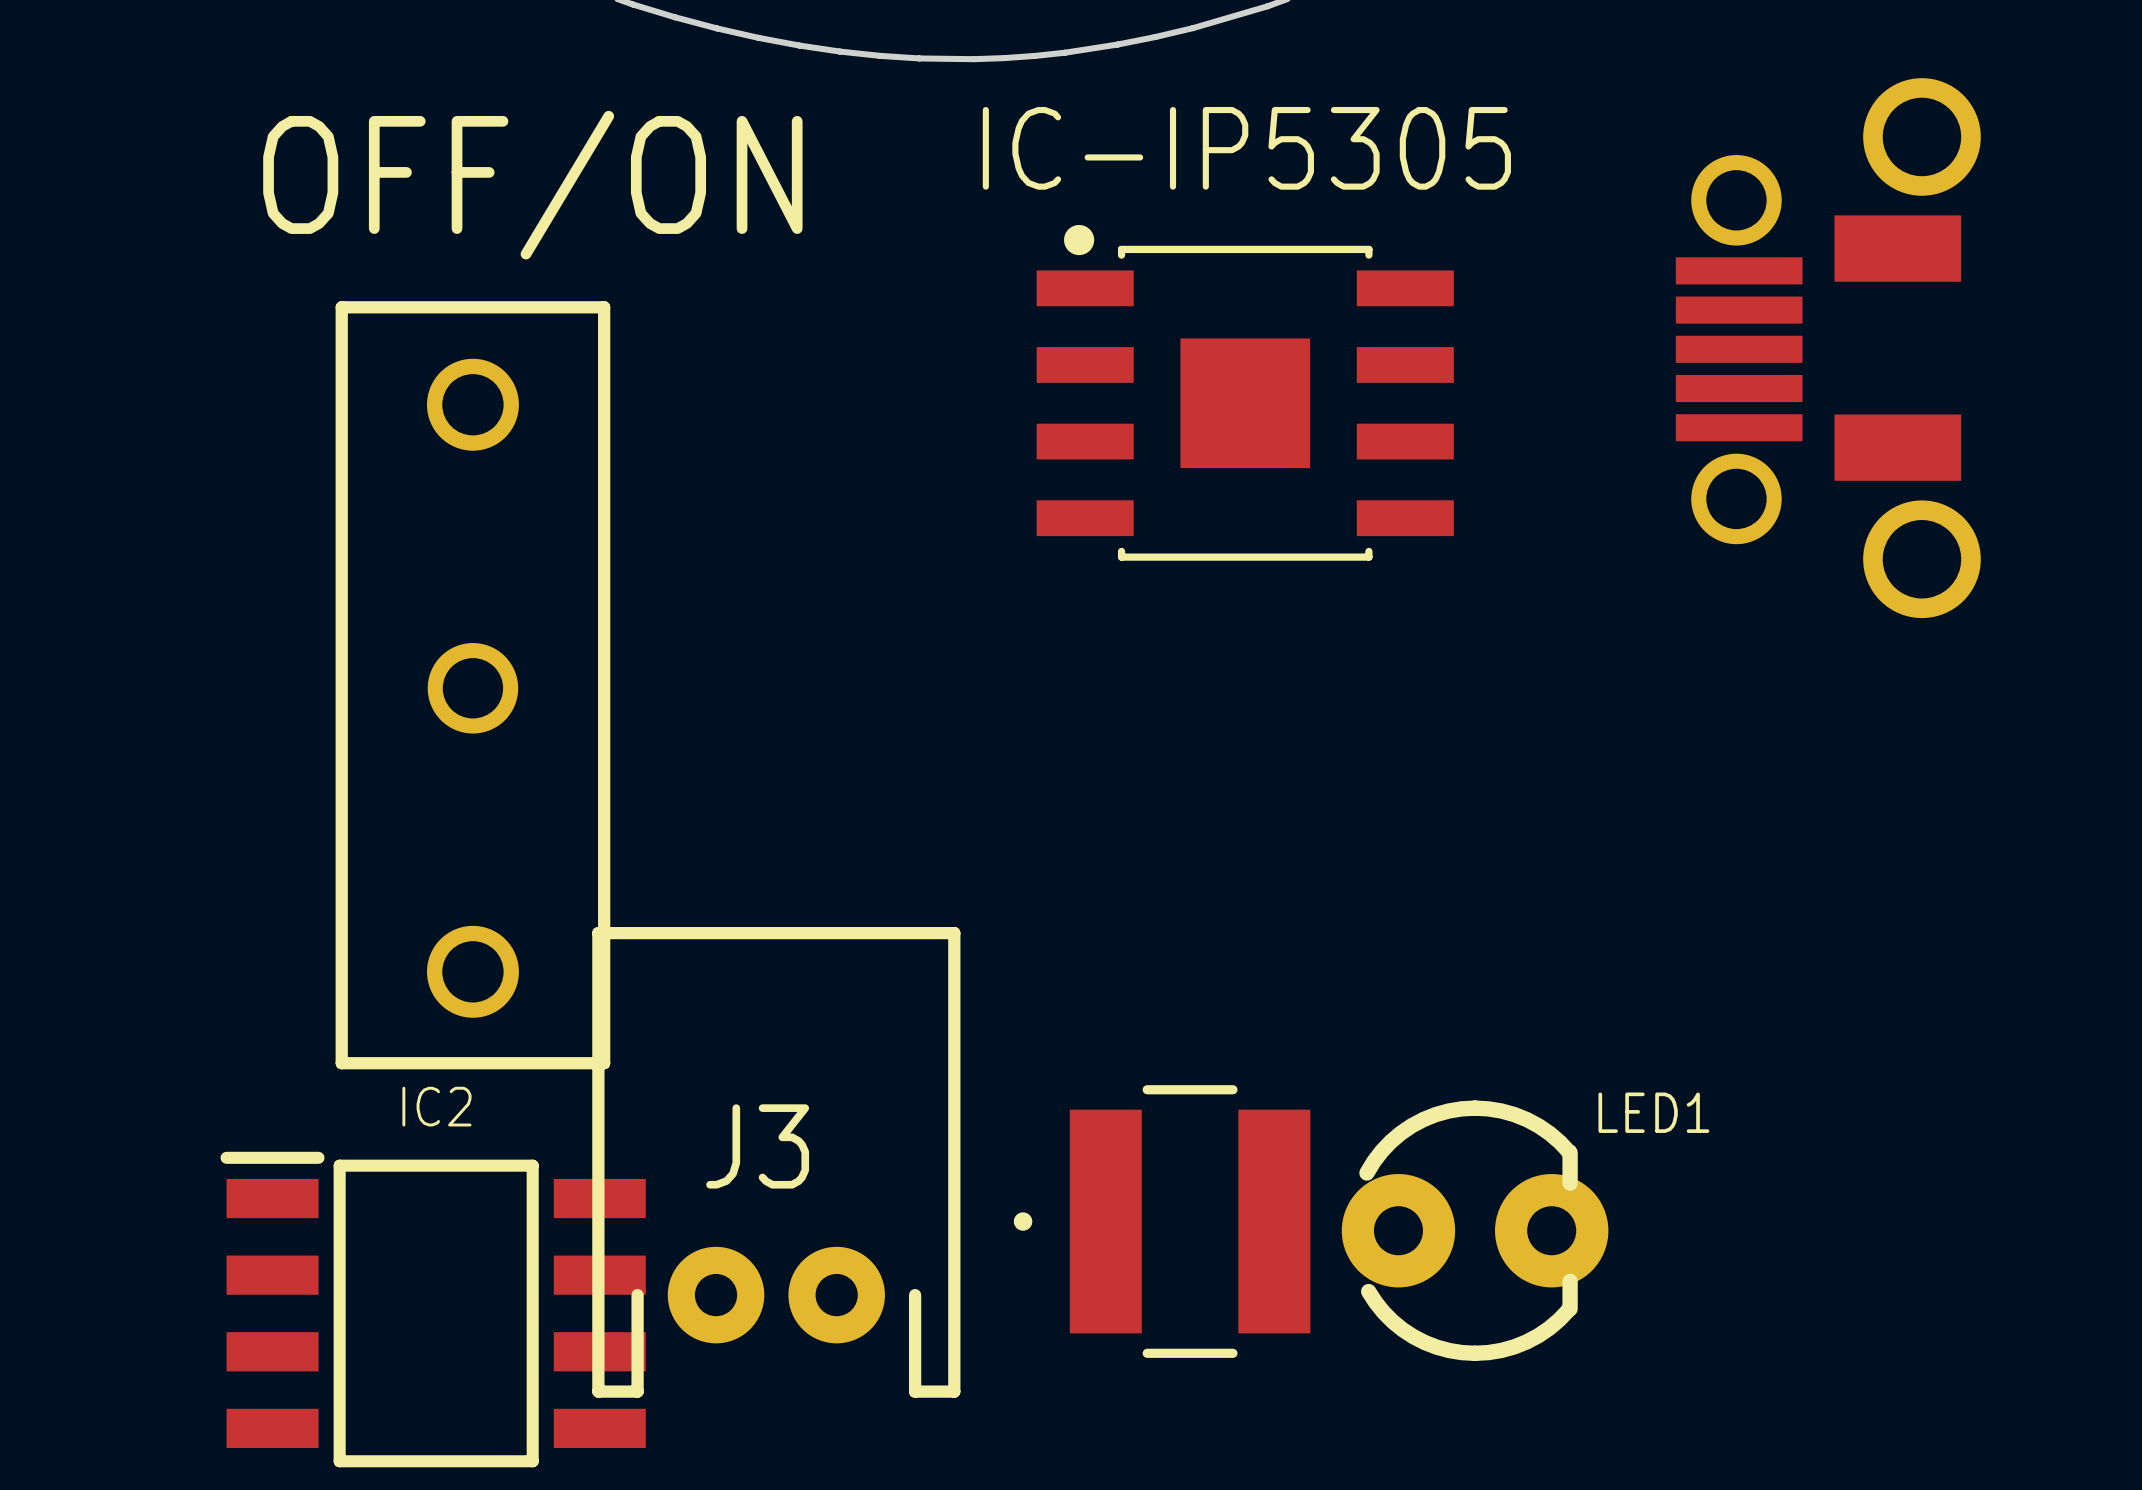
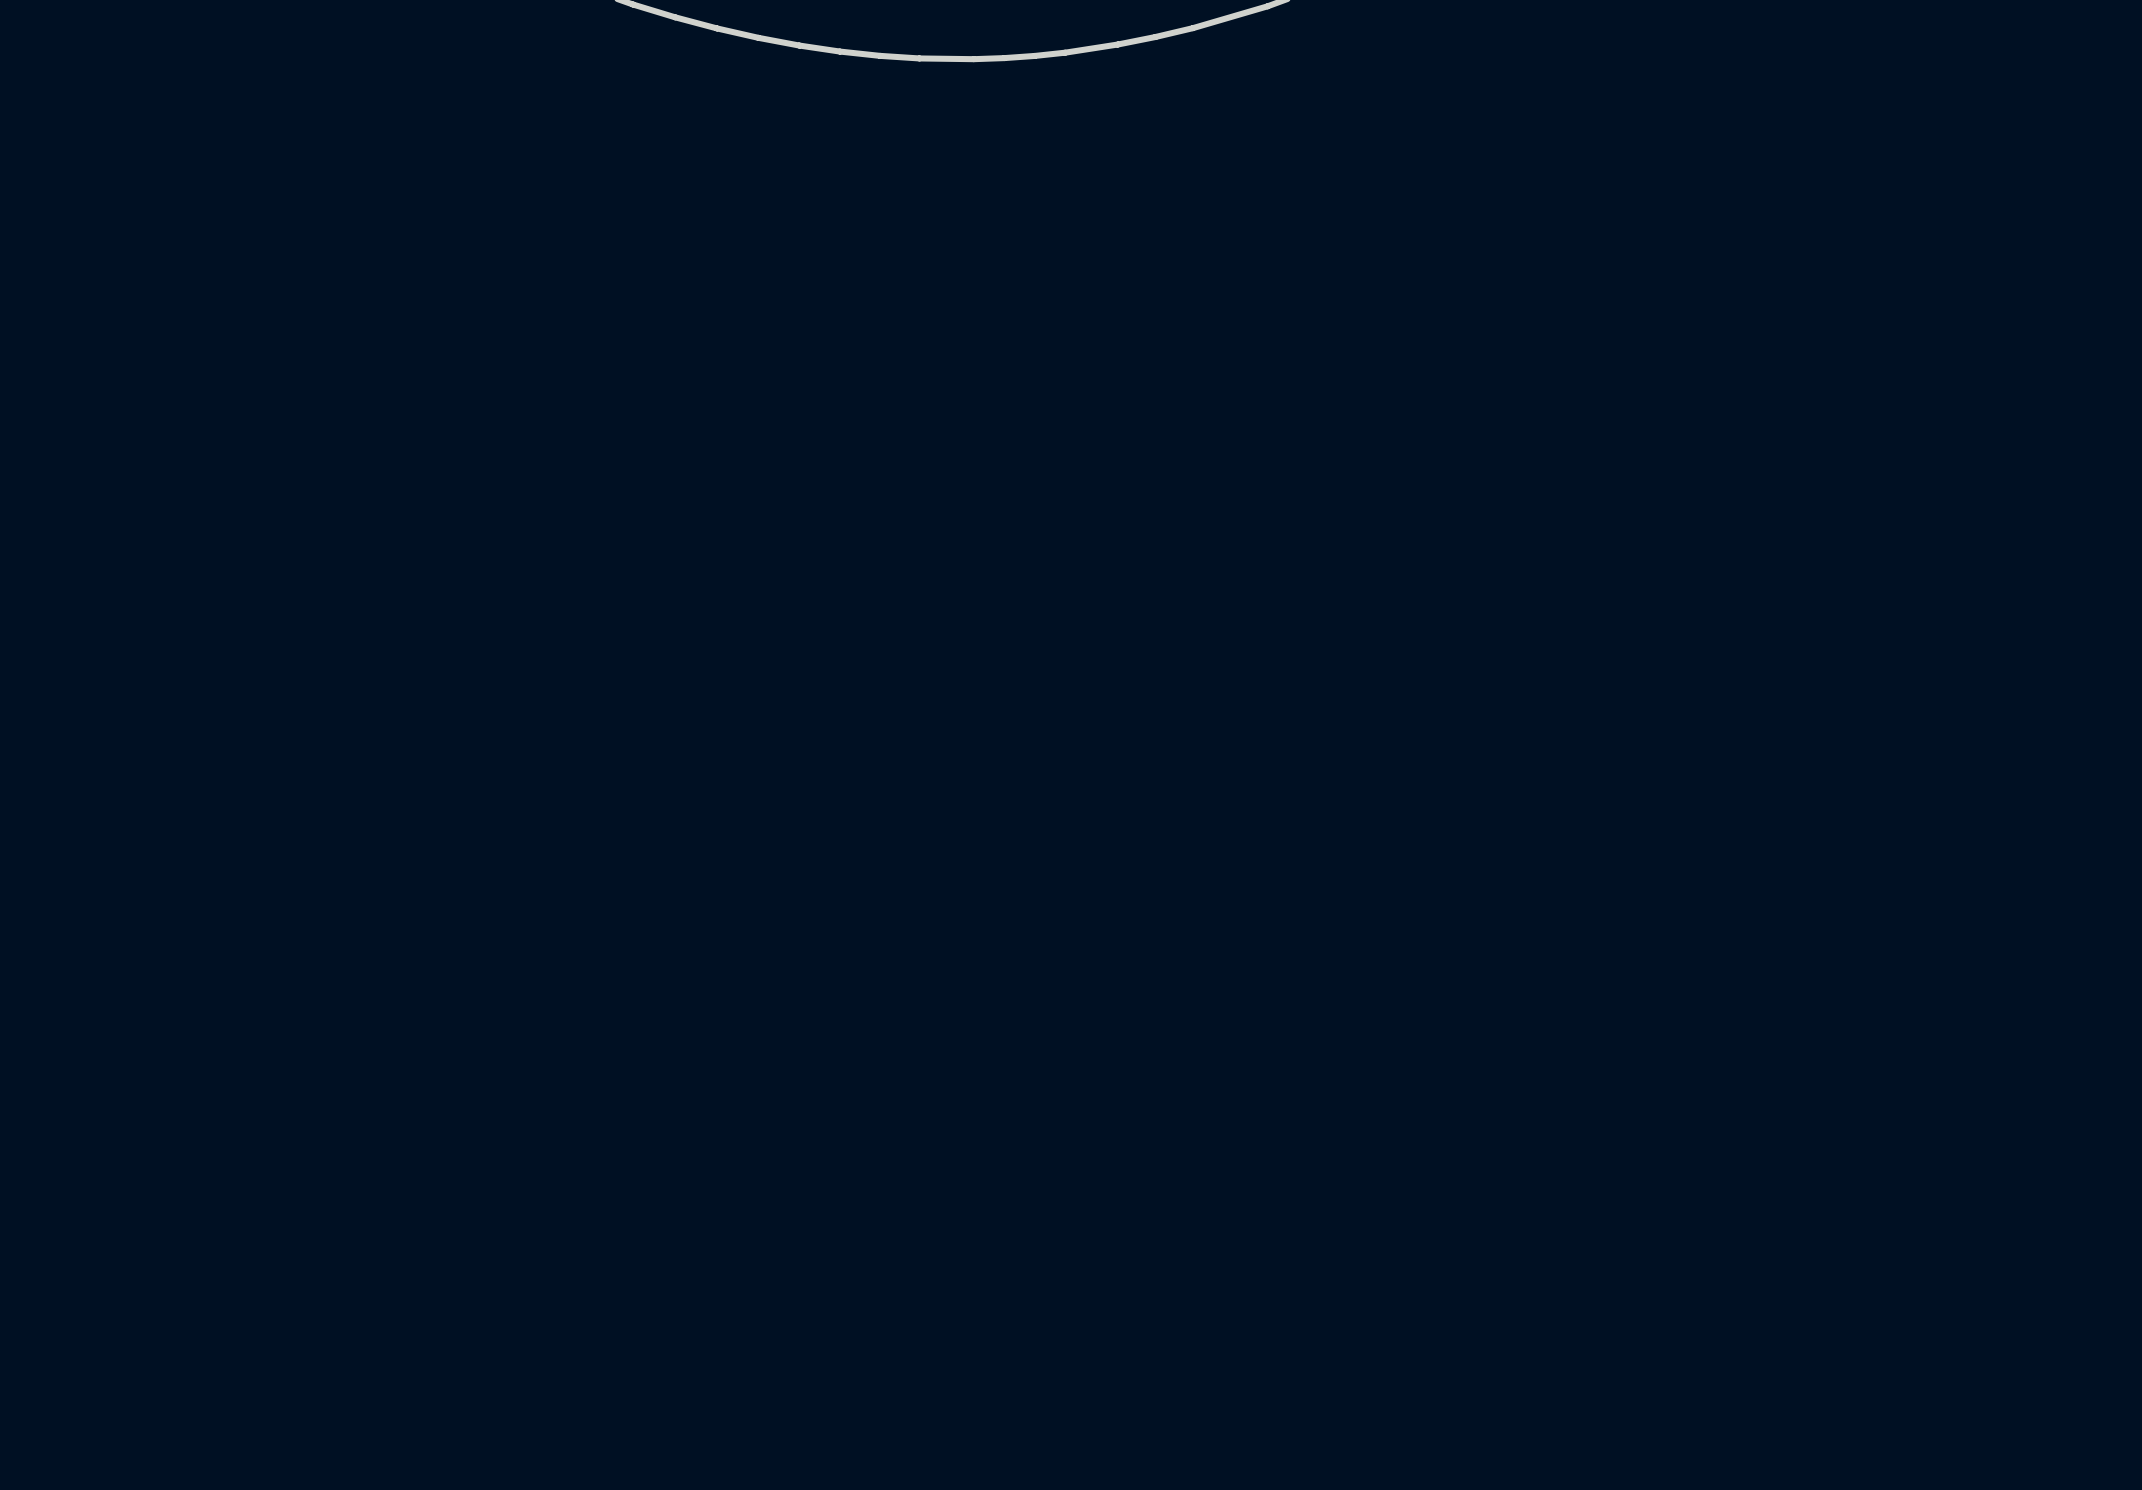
part: (1828, 348) -> none
IC-IP5305: (1245, 392) -> none
OFF/ON: (472, 685) -> none
J3: (776, 1162) -> none
part: (1162, 1221) -> none
LED1: (1475, 1230) -> none
IC2: (433, 1309) -> none

